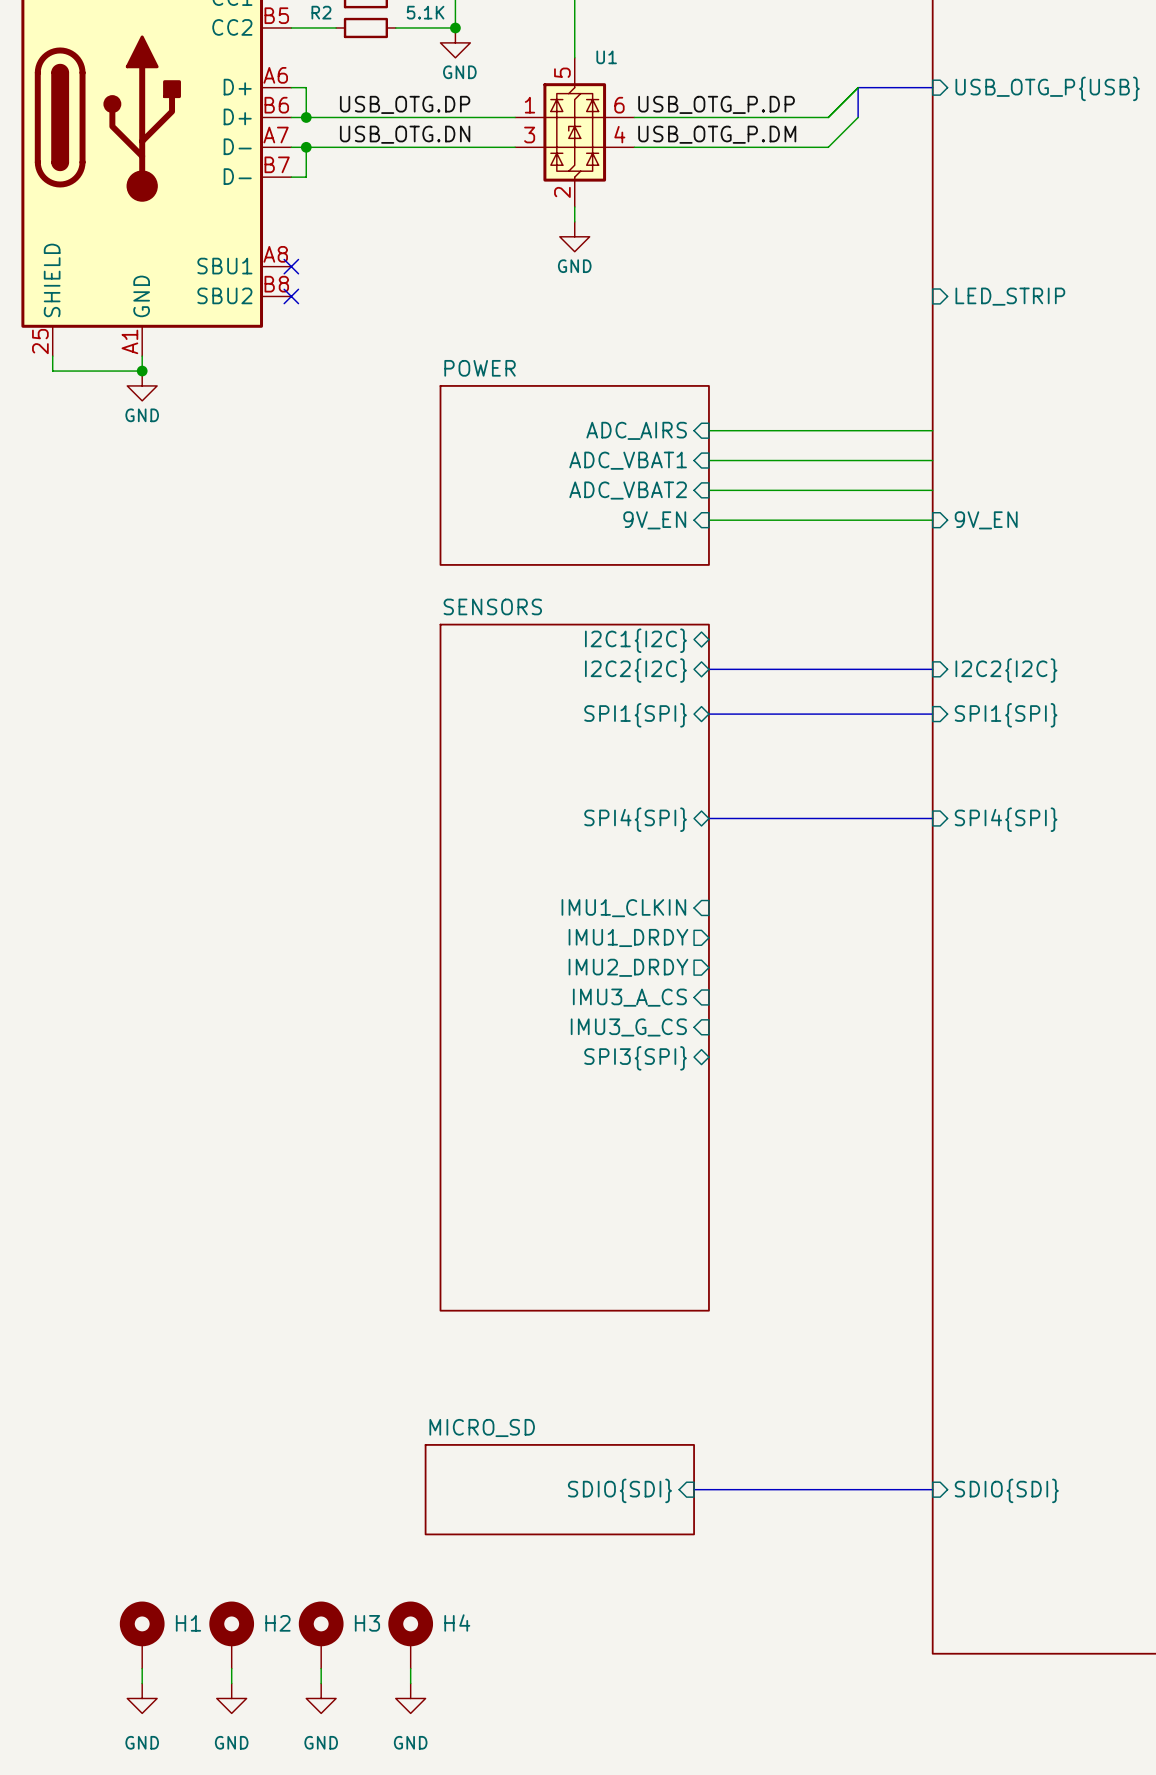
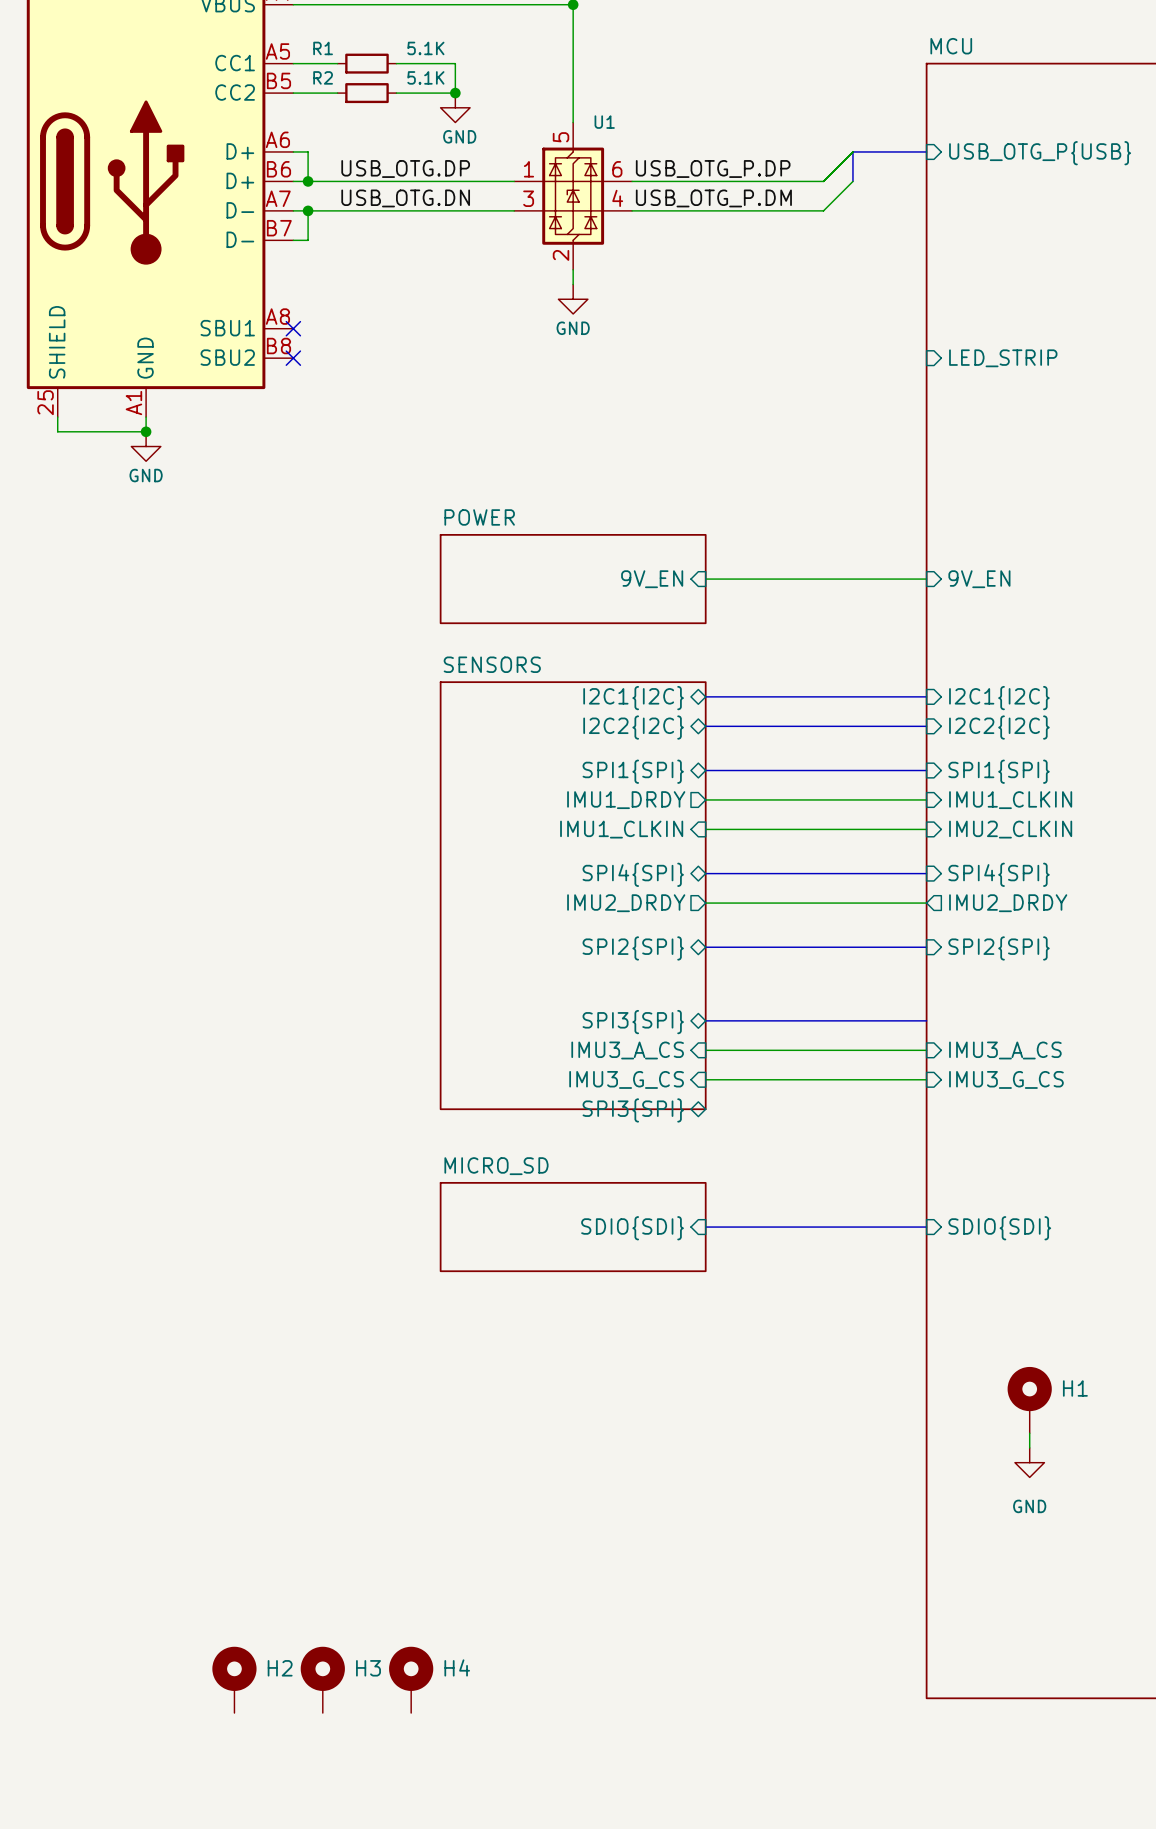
sheet pin: ADC_AIRS (636, 430) -> none
wire: (708, 430) (932, 430) -> none
sheet pin: ADC_VBAT1 (628, 460) -> none
wire: (708, 460) (932, 460) -> (705, 799) (926, 799)
sheet POWER: (574, 475) -> none
sheet pin: ADC_VBAT2 (628, 490) -> none
wire: (708, 490) (932, 490) -> (705, 829) (926, 829)
sheet POWER: none -> (573, 579)
bus: none -> (705, 696) (926, 696)
sheet pin: none -> I2C1{I2C} (999, 698)
sheet pin: none -> IMU1_CLKIN (1010, 800)
sheet pin: none -> IMU2_CLKIN (1010, 829)
sheet SENSORS: none -> (573, 895)
sheet pin: none -> IMU2_DRDY (626, 903)
wire: none -> (705, 903) (926, 903)
sheet pin: none -> IMU2_DRDY (1008, 903)
bus: none -> (705, 947) (926, 947)
sheet pin: none -> SPI2{SPI} (633, 948)
sheet pin: none -> SPI2{SPI} (999, 948)
sheet pin position: IMU1_CLKIN (623, 908) -> IMU1_CLKIN (621, 829)
sheet pin position: IMU1_DRDY (628, 937) -> IMU1_DRDY (626, 800)
sheet SENSORS: (574, 967) -> none
sheet pin shape: output (628, 967) -> bidirectional (633, 1022)
sheet pin: IMU2_DRDY (628, 967) -> SPI3{SPI} (633, 1022)
bus: none -> (705, 1020) (926, 1020)
wire: none -> (705, 1050) (926, 1050)
sheet pin: none -> IMU3_A_CS (1005, 1050)
wire: none -> (705, 1079) (926, 1079)
sheet pin: none -> IMU3_G_CS (1006, 1079)
sheet MICRO_SD: none -> (573, 1227)
bus: none -> (705, 1227) (926, 1227)
sheet pin: none -> SDIO{SDI} (632, 1228)
sheet pin: none -> SDIO{SDI} (999, 1228)
wire: none -> (1029, 1433) (1029, 1447)
power symbol: none -> GND (1029, 1462)
sheet MICRO_SD: (559, 1489) -> none
bus: (694, 1489) (932, 1489) -> none
sheet pin: SDIO{SDI} (619, 1490) -> none
sheet pin: SDIO{SDI} (1006, 1490) -> none
H1 position: (142, 1635) -> (1029, 1400)
wire: (142, 1668) (142, 1683) -> none
wire: (231, 1668) (231, 1683) -> none
wire: (321, 1668) (321, 1683) -> none
wire: (410, 1668) (410, 1683) -> none
power symbol: GND (142, 1698) -> none
power symbol: GND (231, 1698) -> none
power symbol: GND (321, 1698) -> none
power symbol: GND (410, 1698) -> none

